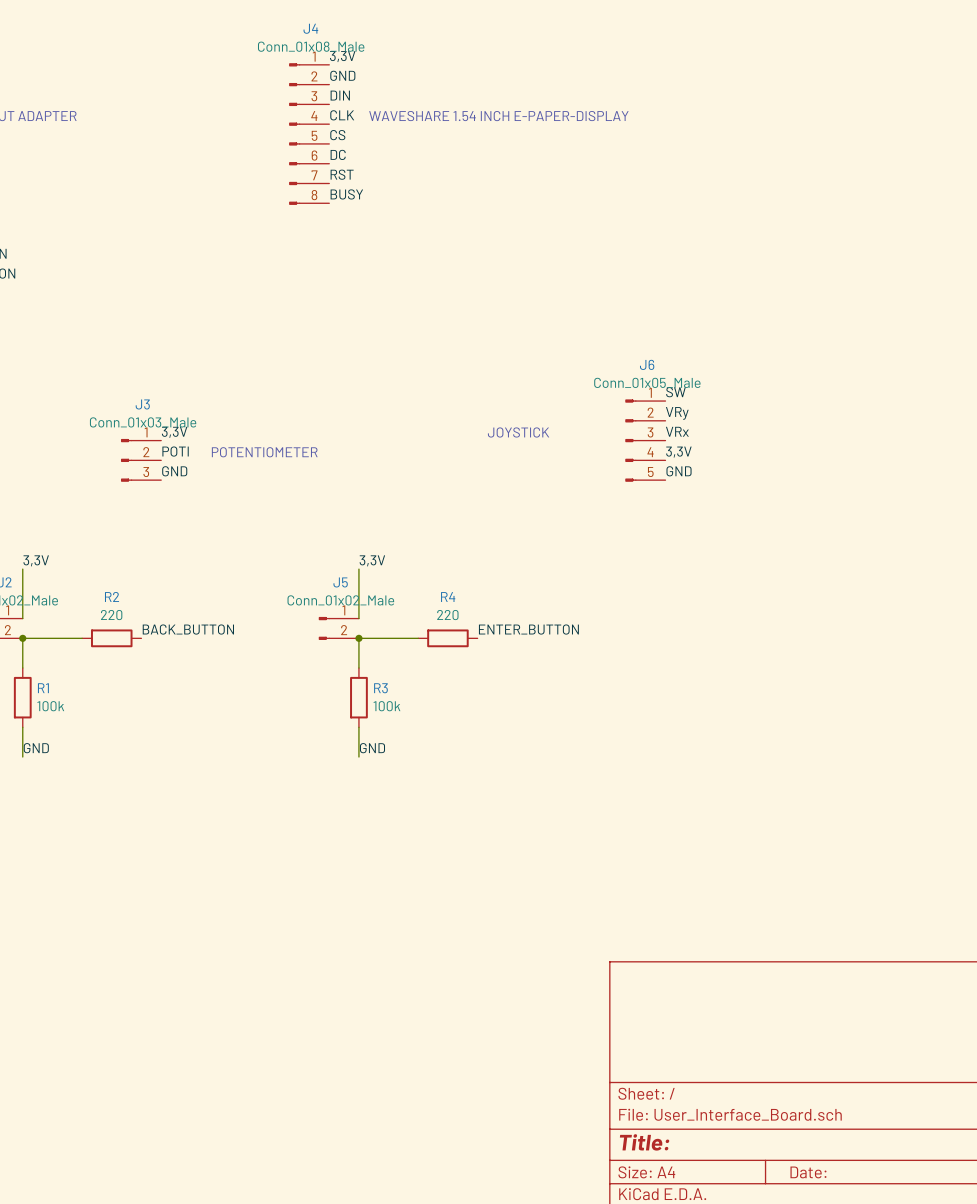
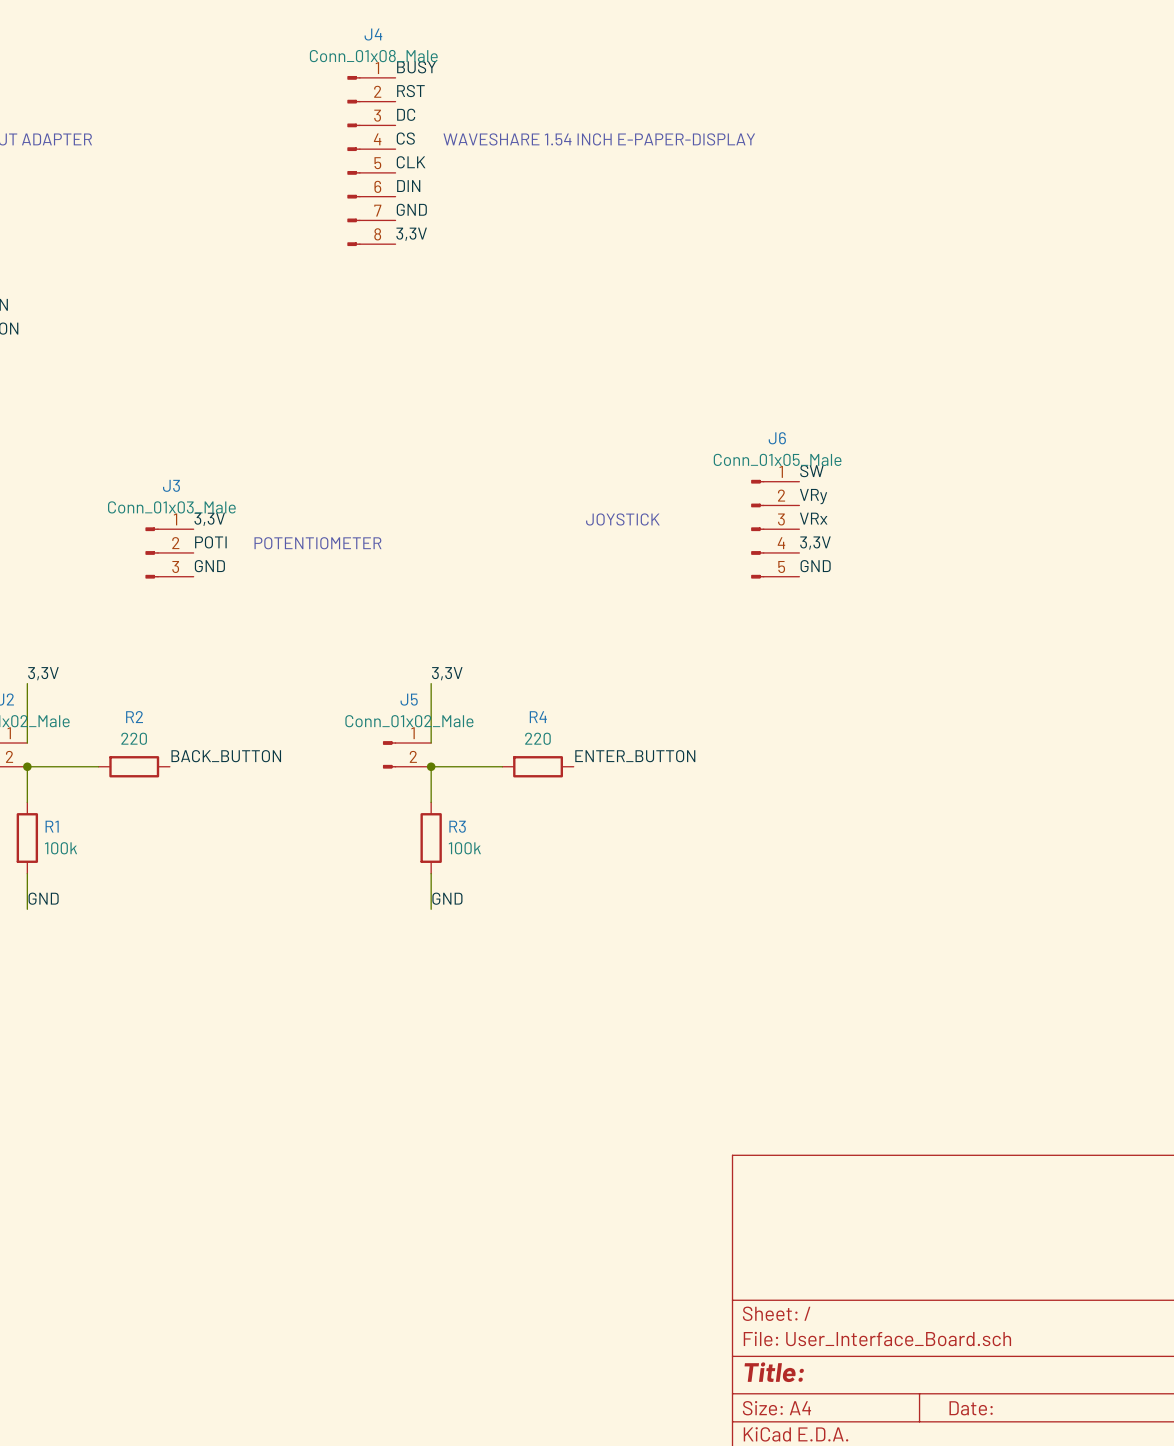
label: 3,3V (342, 56) -> BUSY (416, 67)
label: GND (342, 75) -> RST (410, 91)
label: DIN (340, 95) -> DC (406, 114)
label: CLK (342, 115) -> CS (405, 138)
label: CS (337, 135) -> CLK (411, 162)
label: DC (338, 154) -> DIN (408, 186)
label: RST (342, 174) -> GND (411, 209)
label: BUSY (346, 194) -> 3,3V (411, 234)

